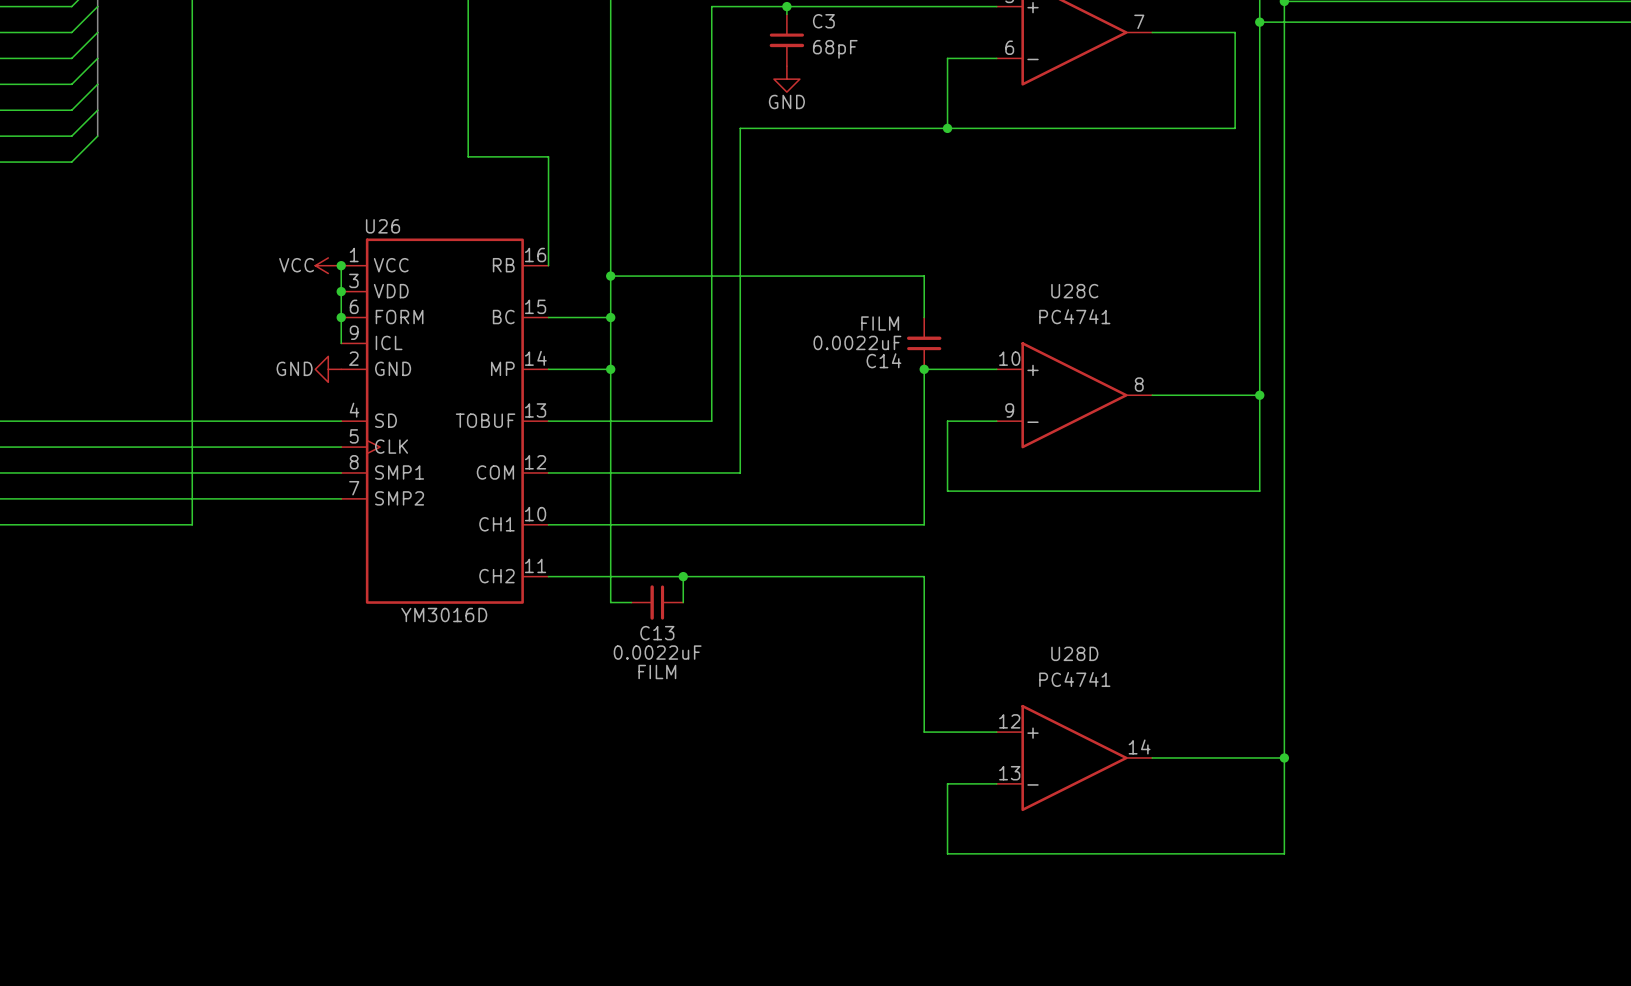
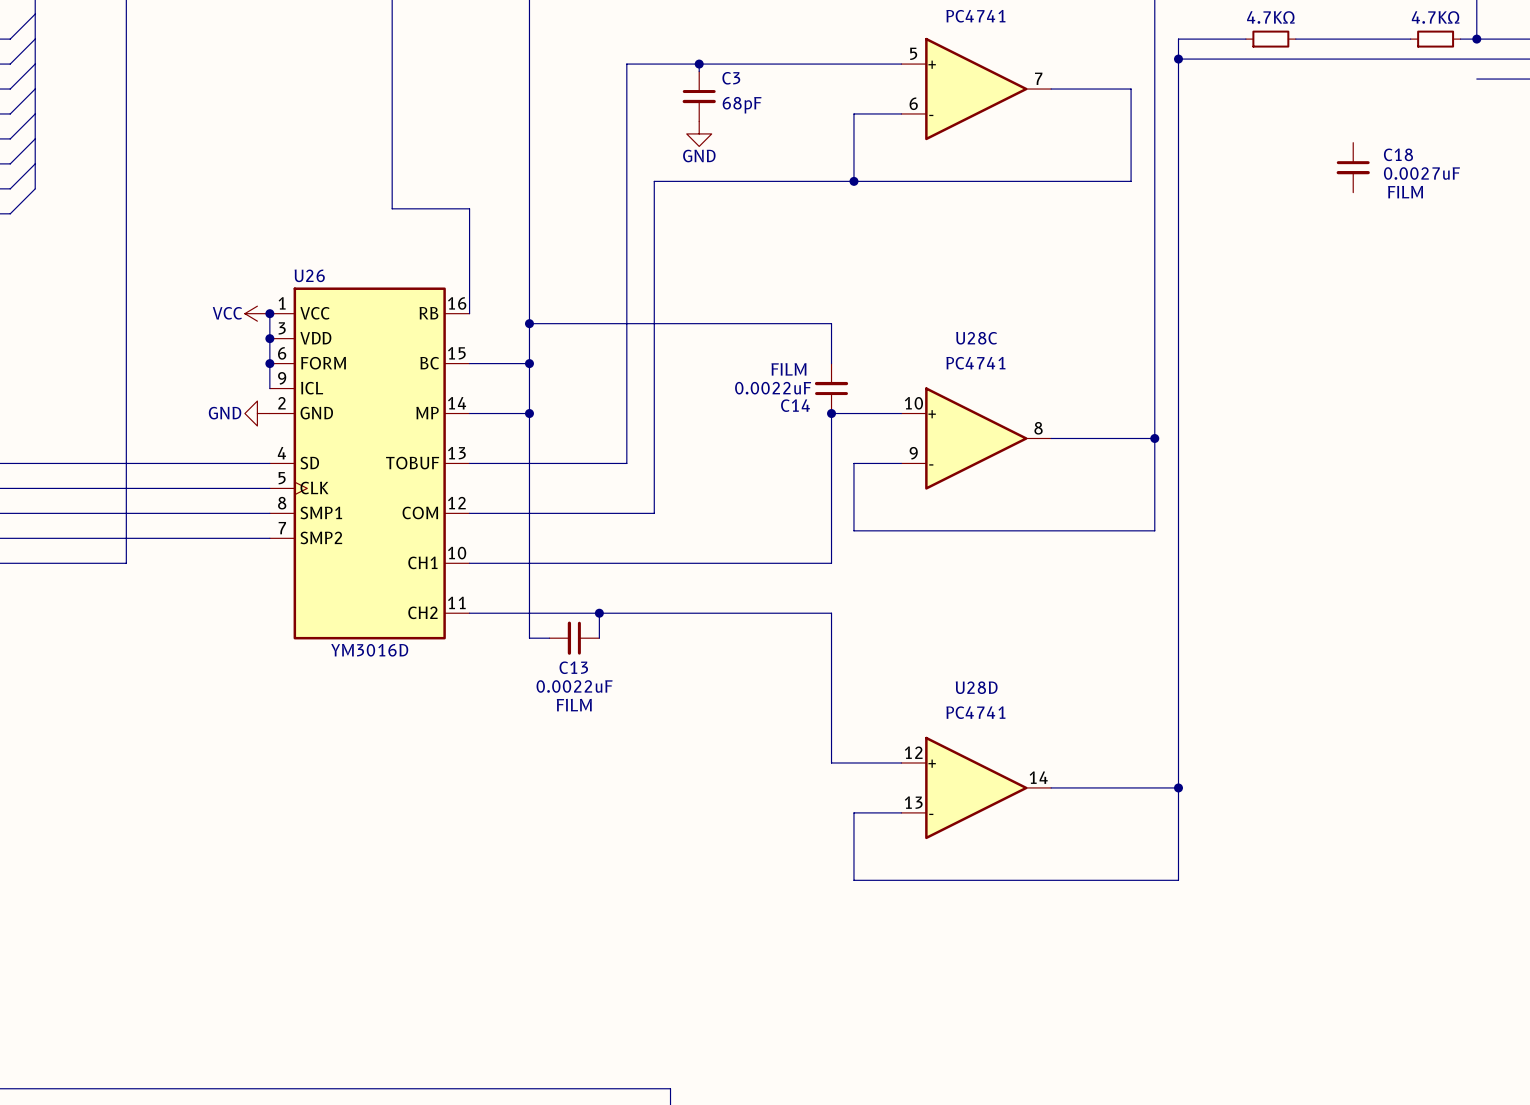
wire: (1259, 22) (1593, 22) -> none
junction: (1259, 22) -> none
C18: none -> 0.0027uF (1353, 167)

